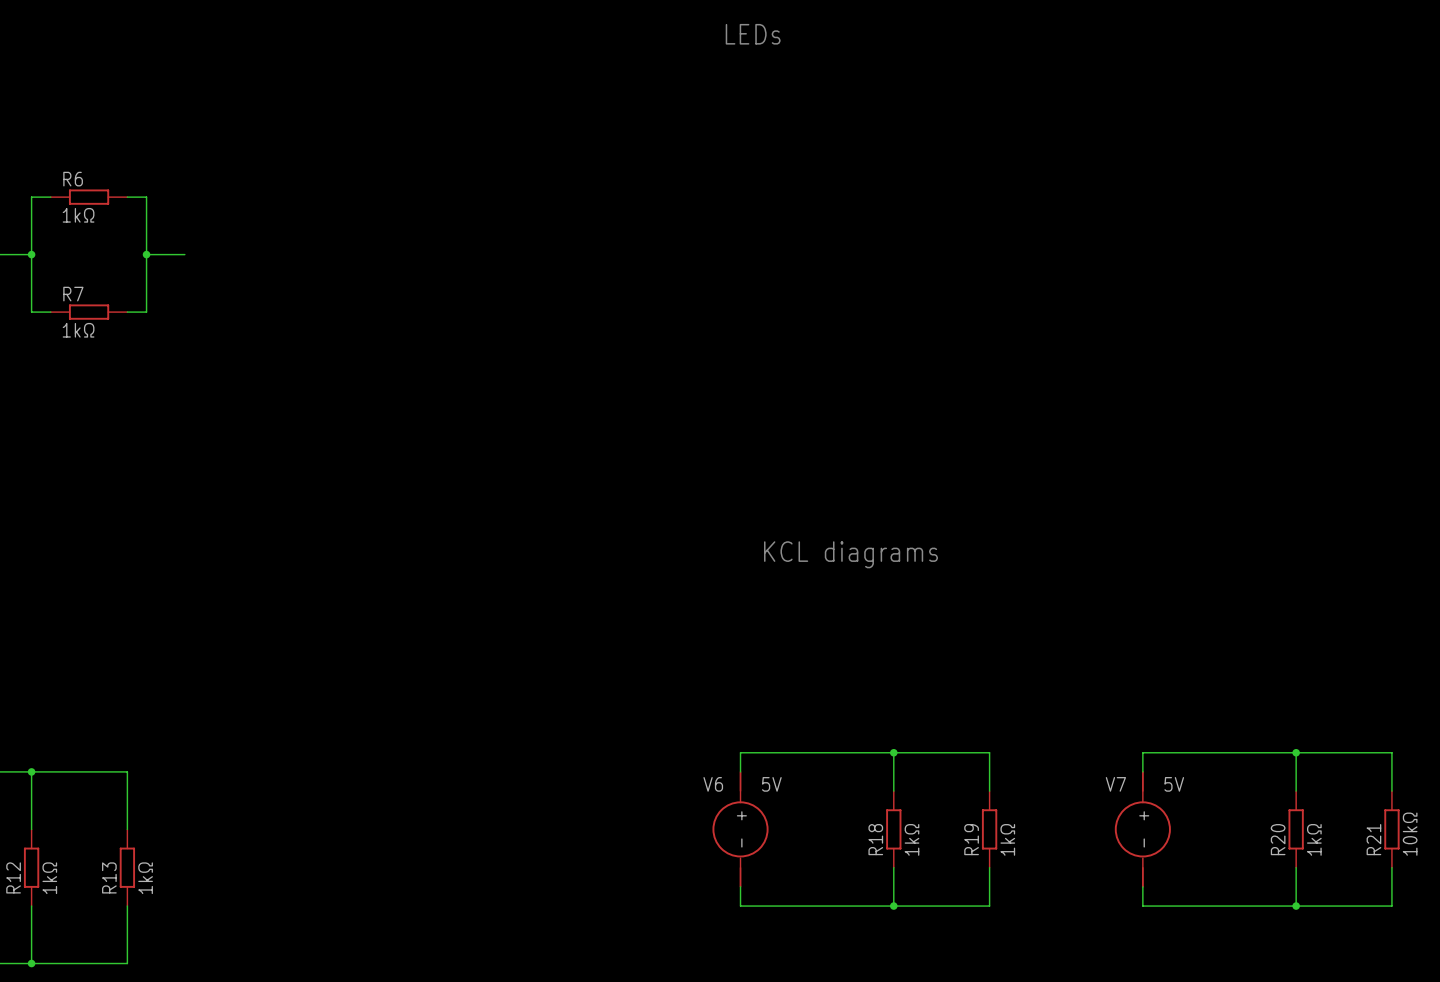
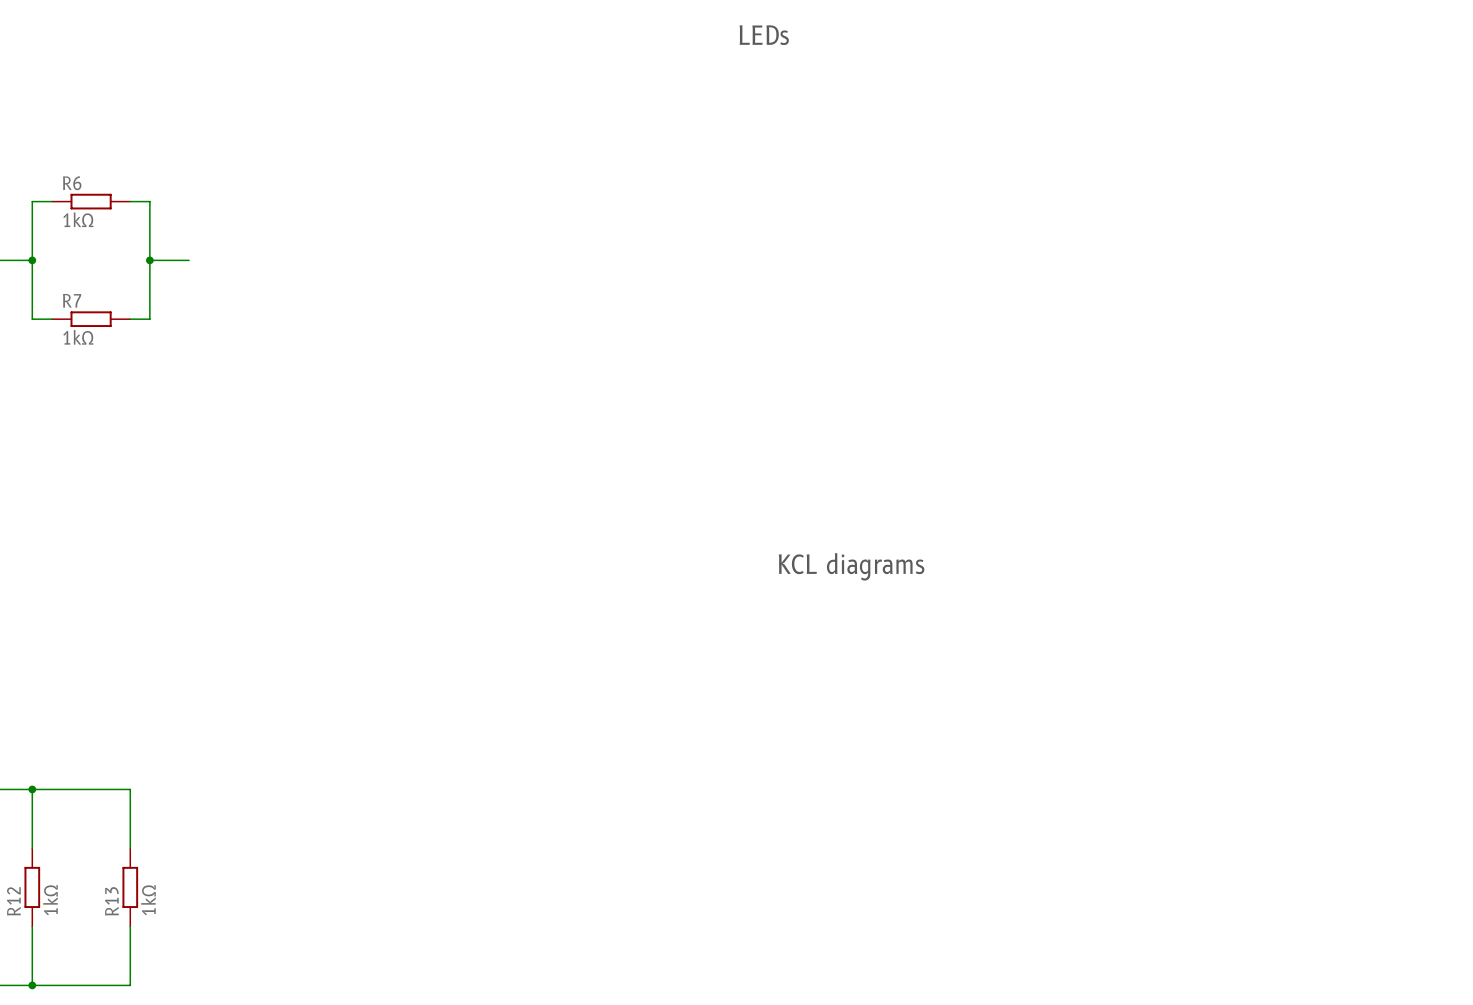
wire: (893, 752) (893, 791) -> none
junction: (893, 752) -> none
wire: (1296, 752) (1296, 791) -> none
junction: (1296, 752) -> none
wire: (740, 771) (740, 752) (989, 752) (989, 791) -> none
wire: (1142, 771) (1142, 752) (1391, 752) (1391, 791) -> none
V6: 5V (740, 829) -> none
R18: 1kΩ (893, 829) -> none
R19: 1kΩ (989, 829) -> none
V7: 5V (1142, 829) -> none
R20: 1kΩ (1296, 829) -> none
R21: 10kΩ (1391, 829) -> none
wire: (893, 867) (893, 906) -> none
wire: (989, 867) (989, 906) (740, 906) (740, 886) -> none
wire: (1296, 867) (1296, 906) -> none
wire: (1391, 867) (1391, 906) (1142, 906) (1142, 886) -> none
junction: (893, 906) -> none
junction: (1296, 906) -> none

